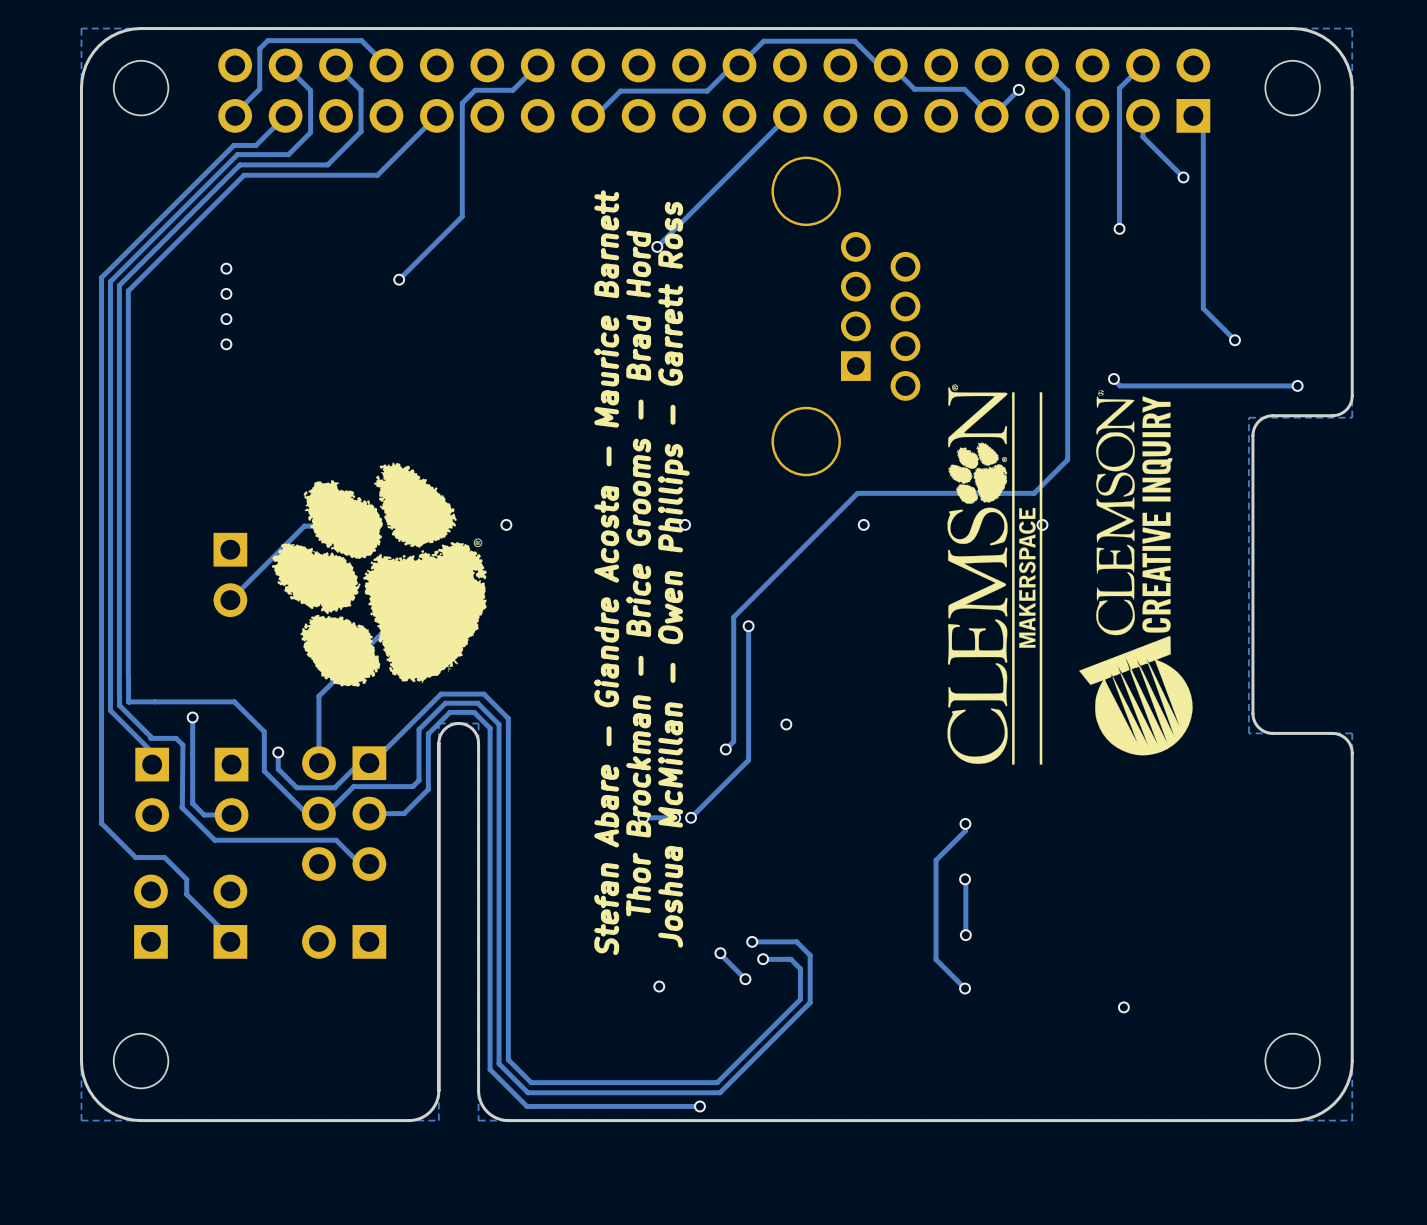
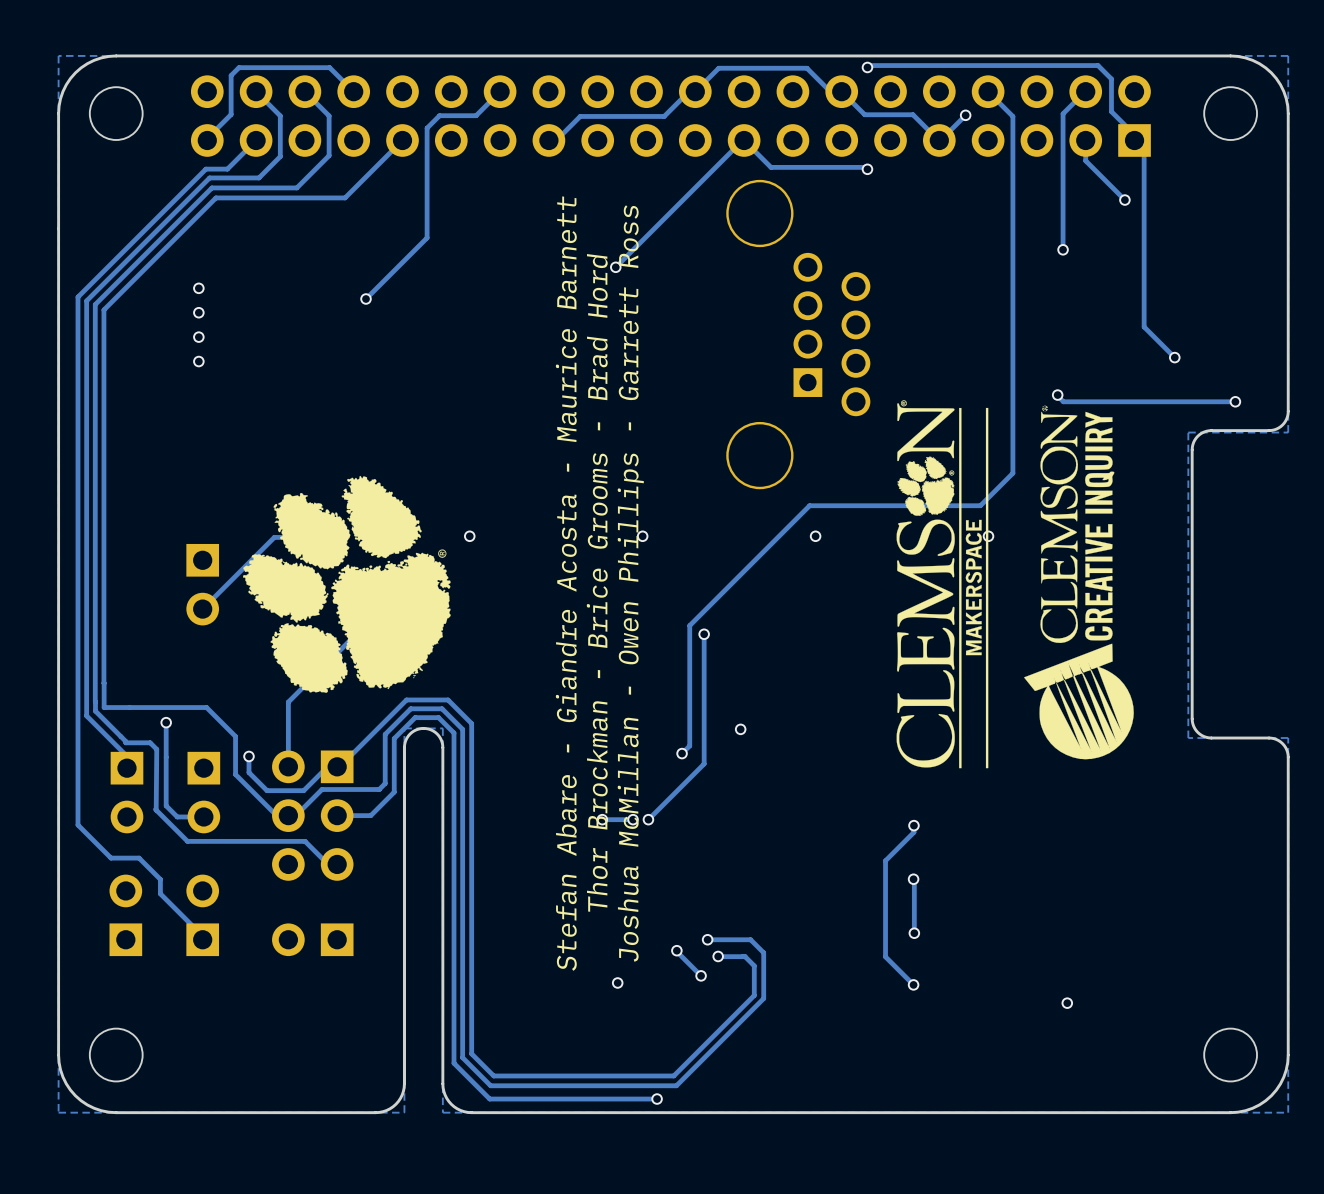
track: none -> (867, 67) (869, 65) (1098, 65) (1111, 79) (1111, 111) (1134, 134) (1134, 140)
via: none -> (867, 67)
track: none -> (744, 140) (771, 167) (865, 167) (867, 169)
via: none -> (867, 169)

